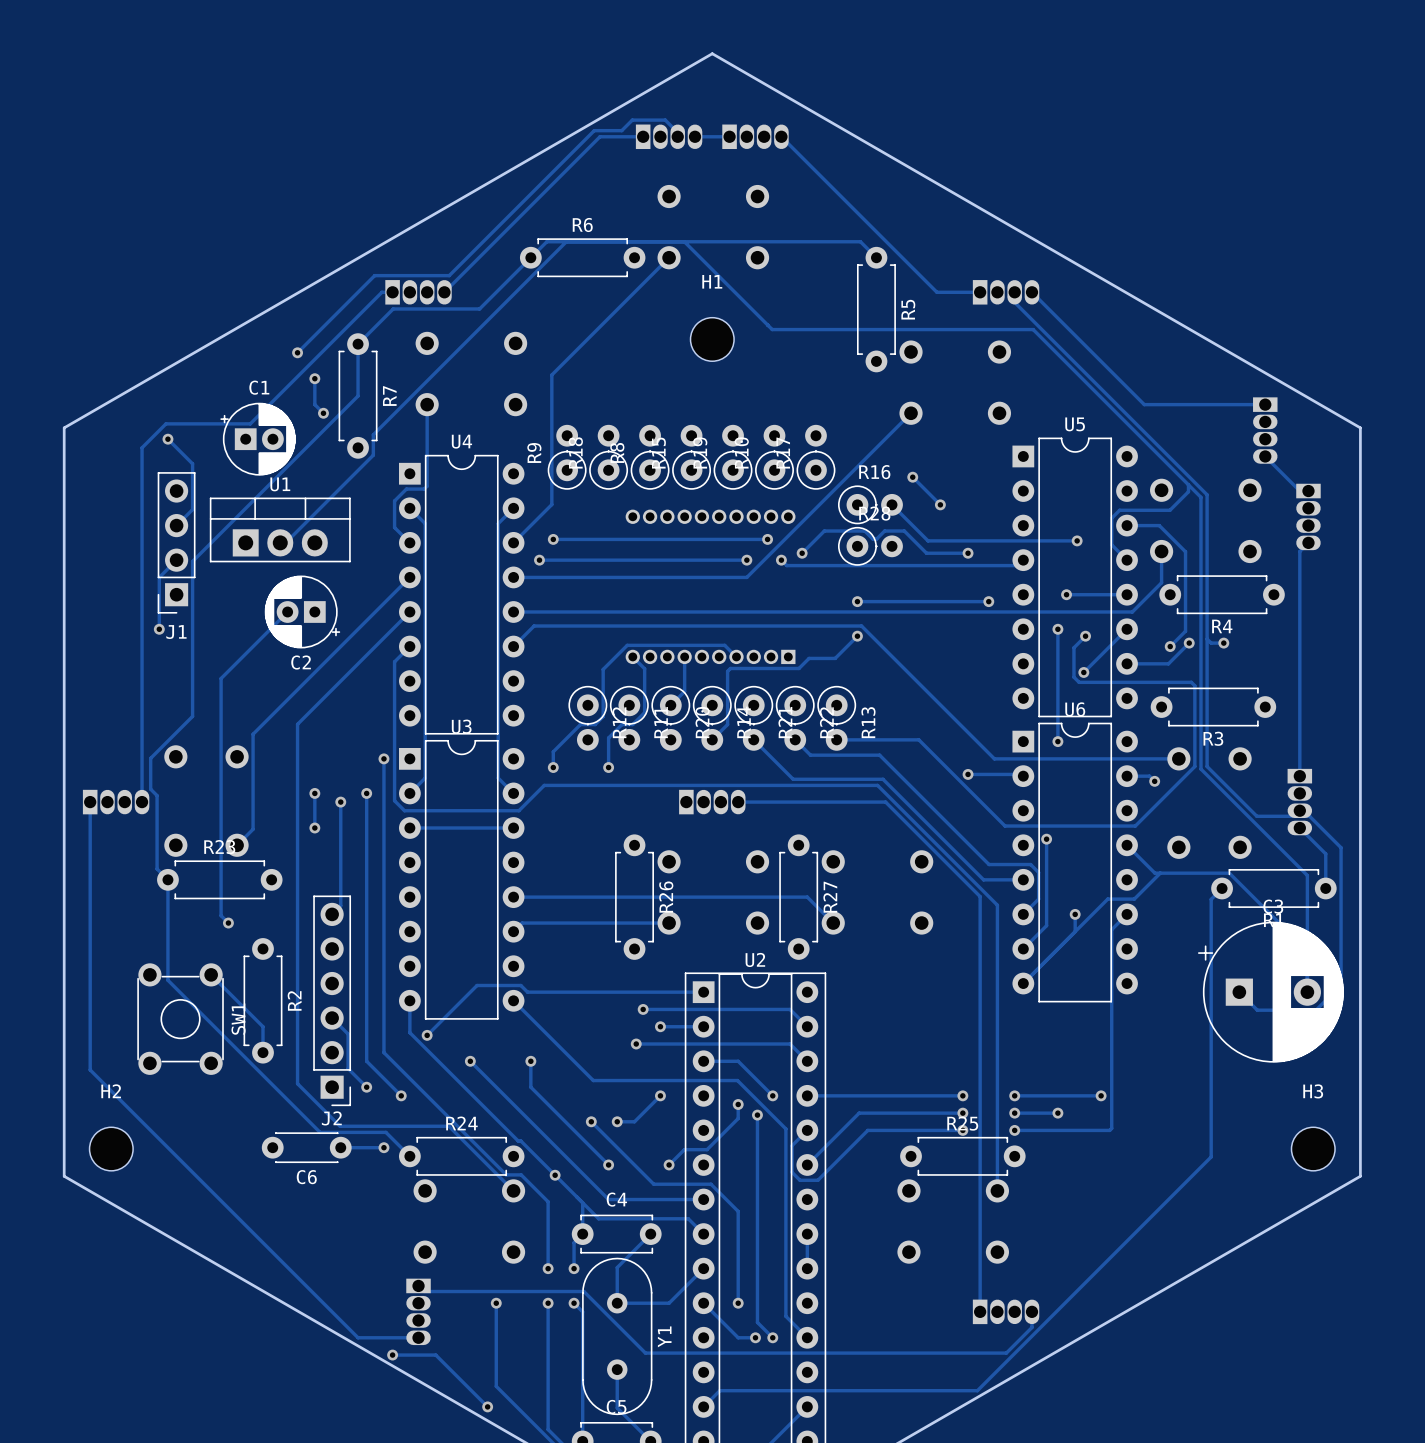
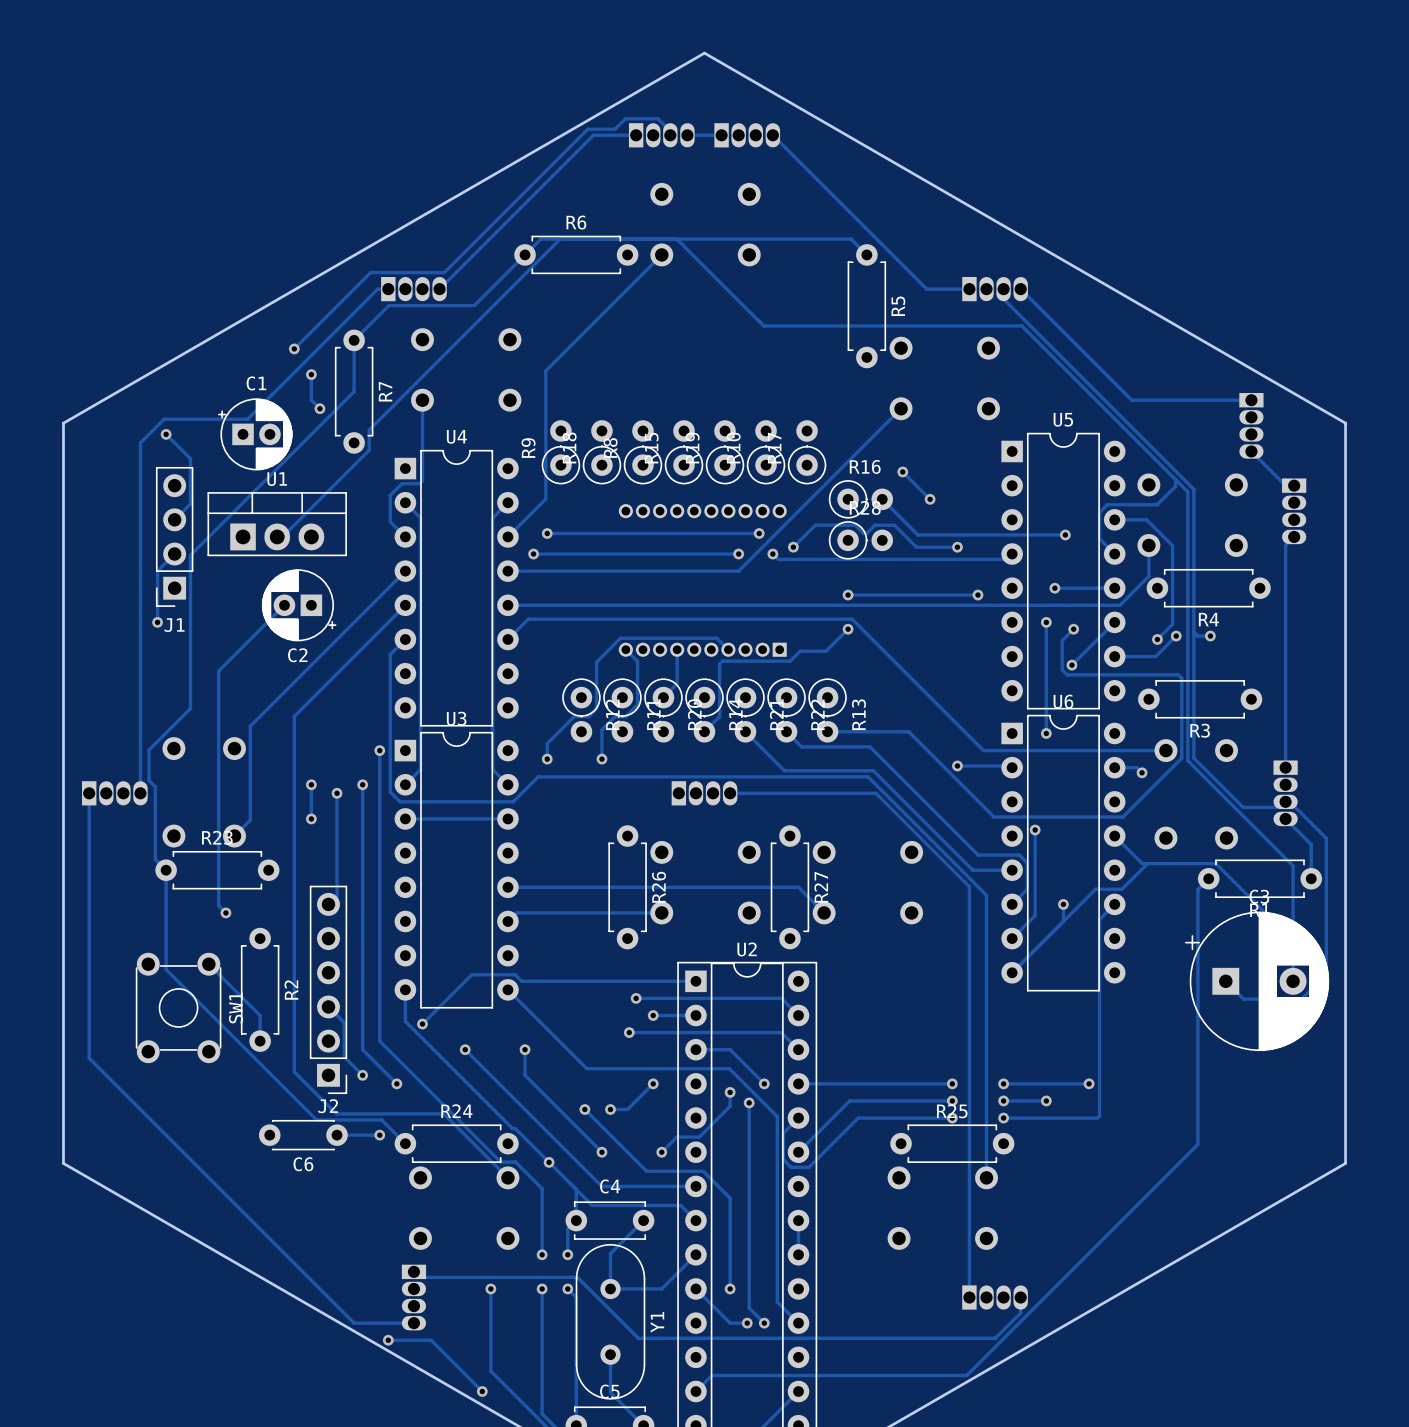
H1: (712, 339) -> none
H2: (111, 1149) -> none
H3: (1313, 1149) -> none

